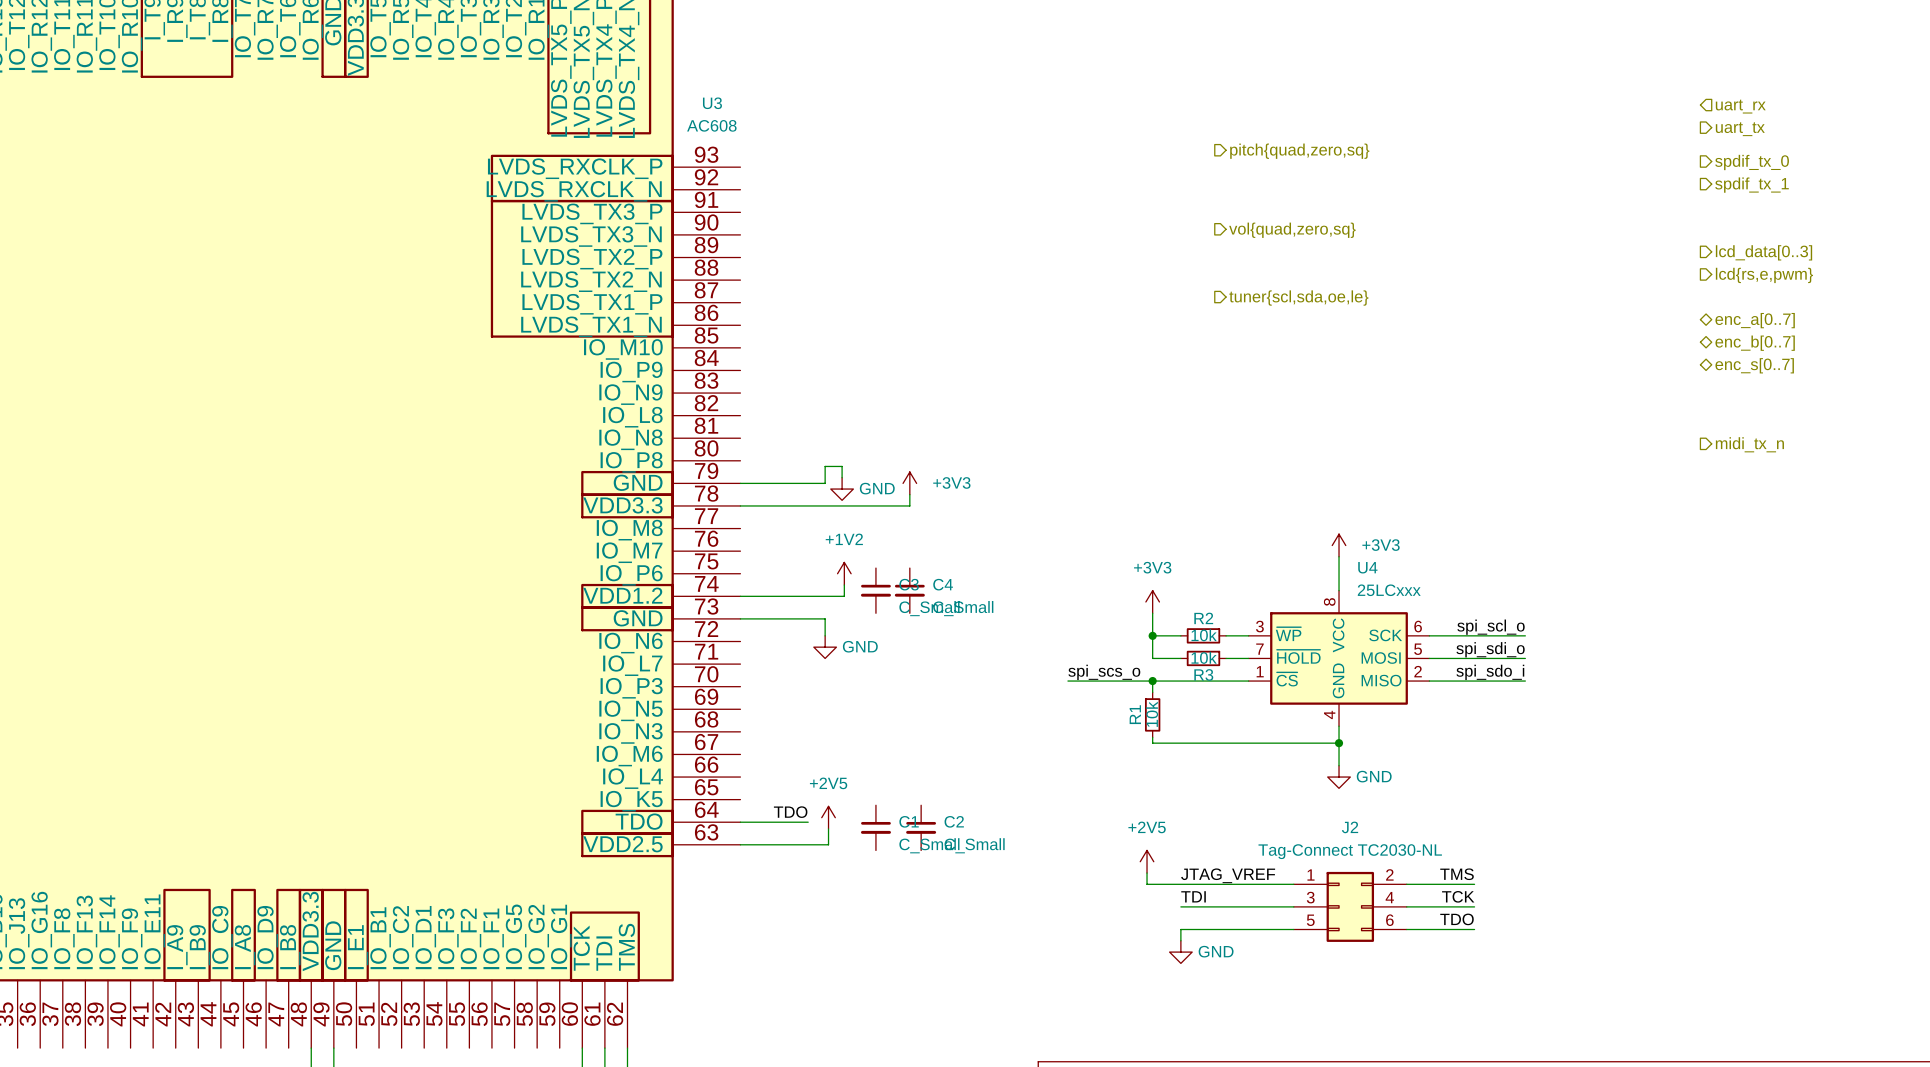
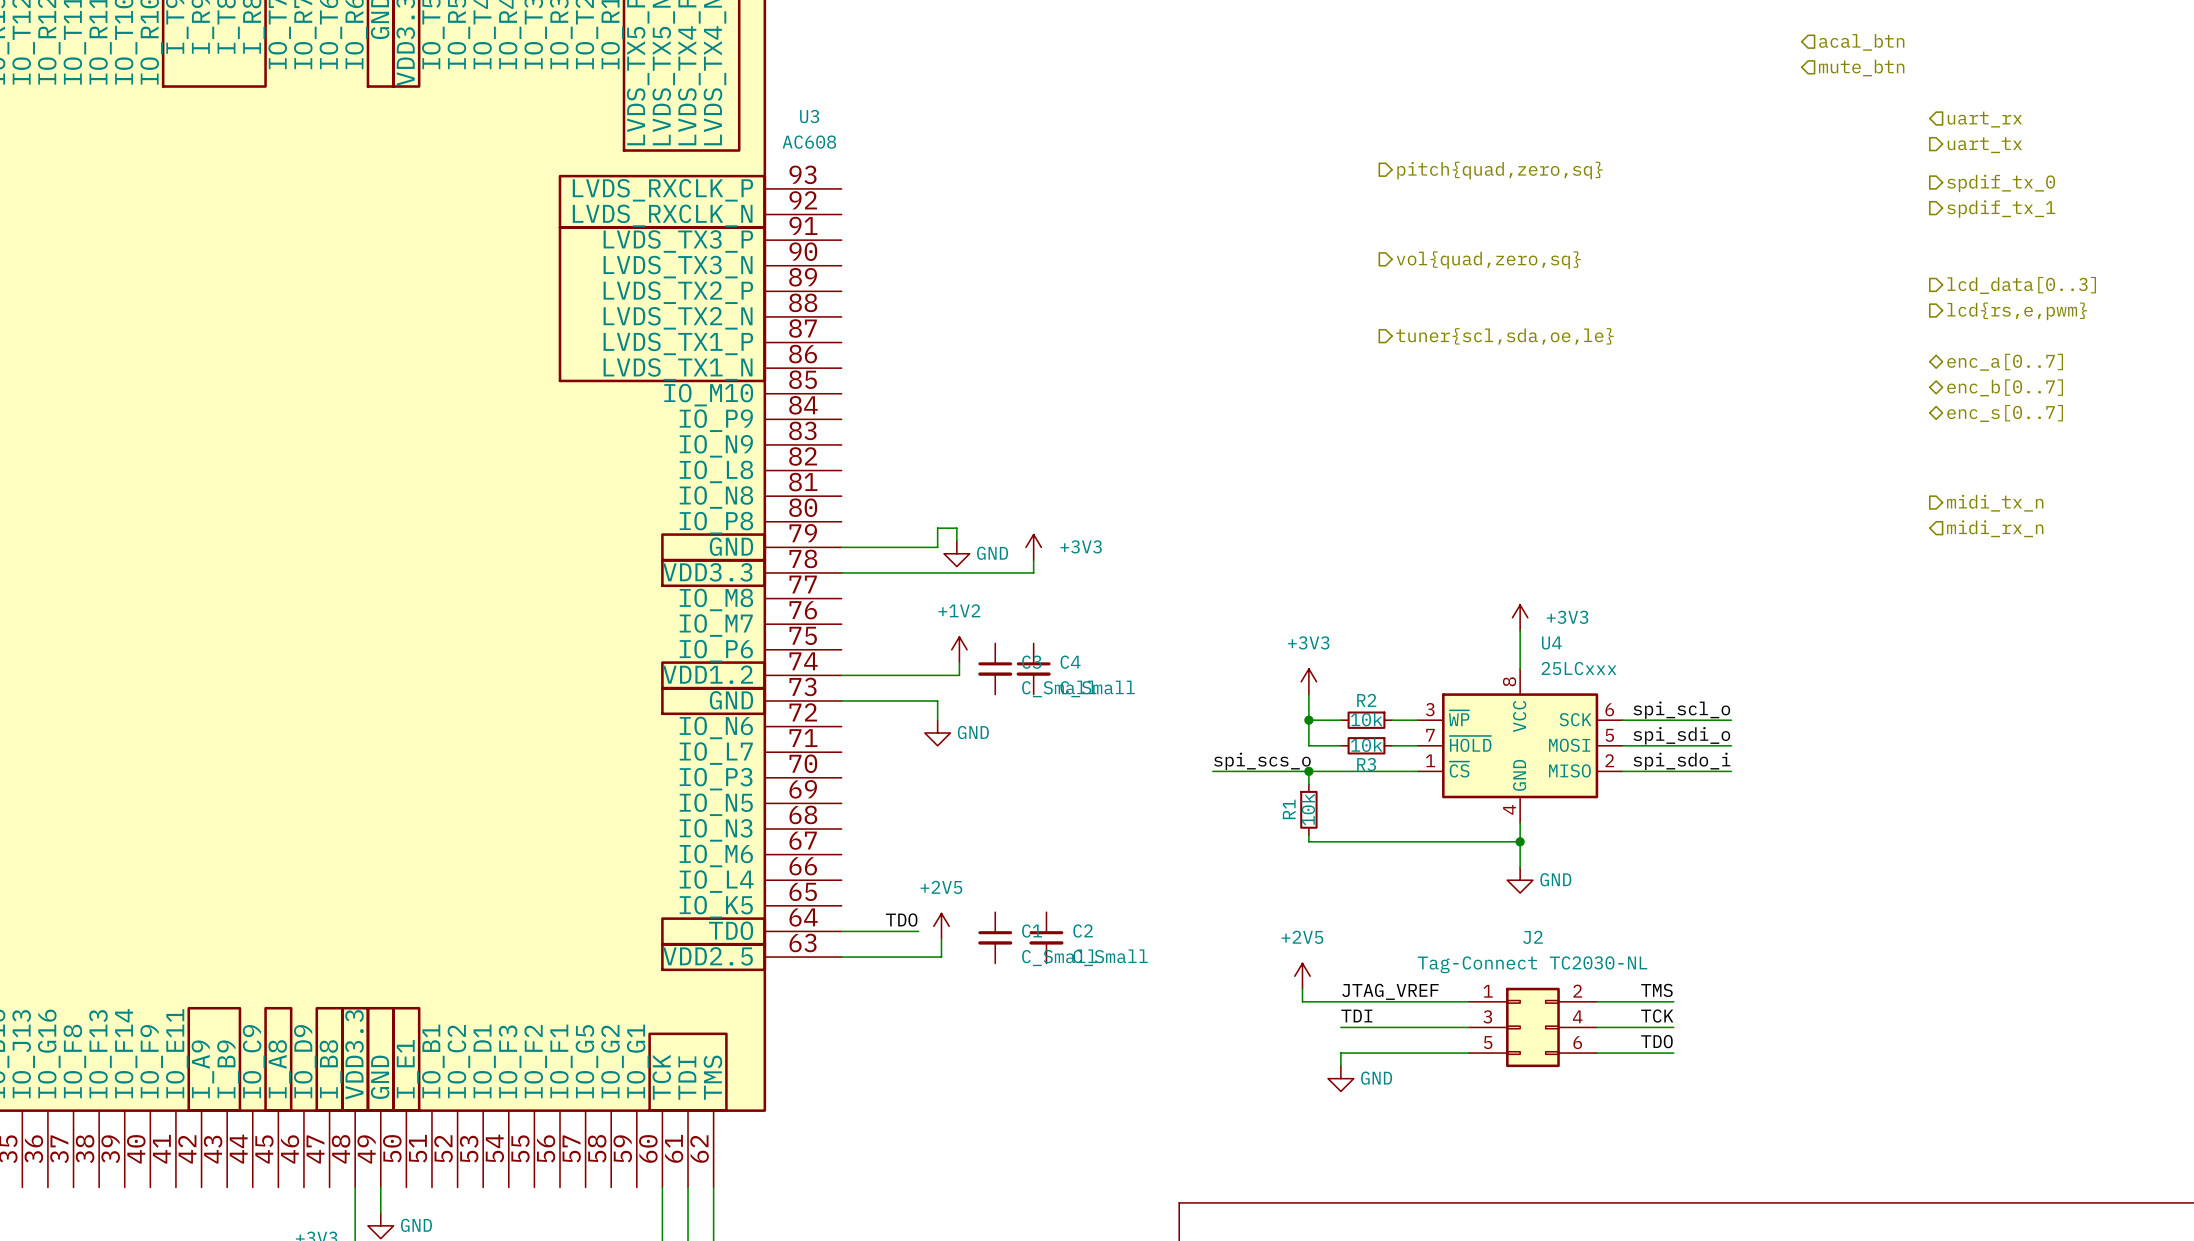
hierarchical label: none -> acal_btn (1861, 42)
hierarchical label: none -> mute_btn (1861, 67)
hierarchical label: none -> midi_rx_n (1995, 528)

